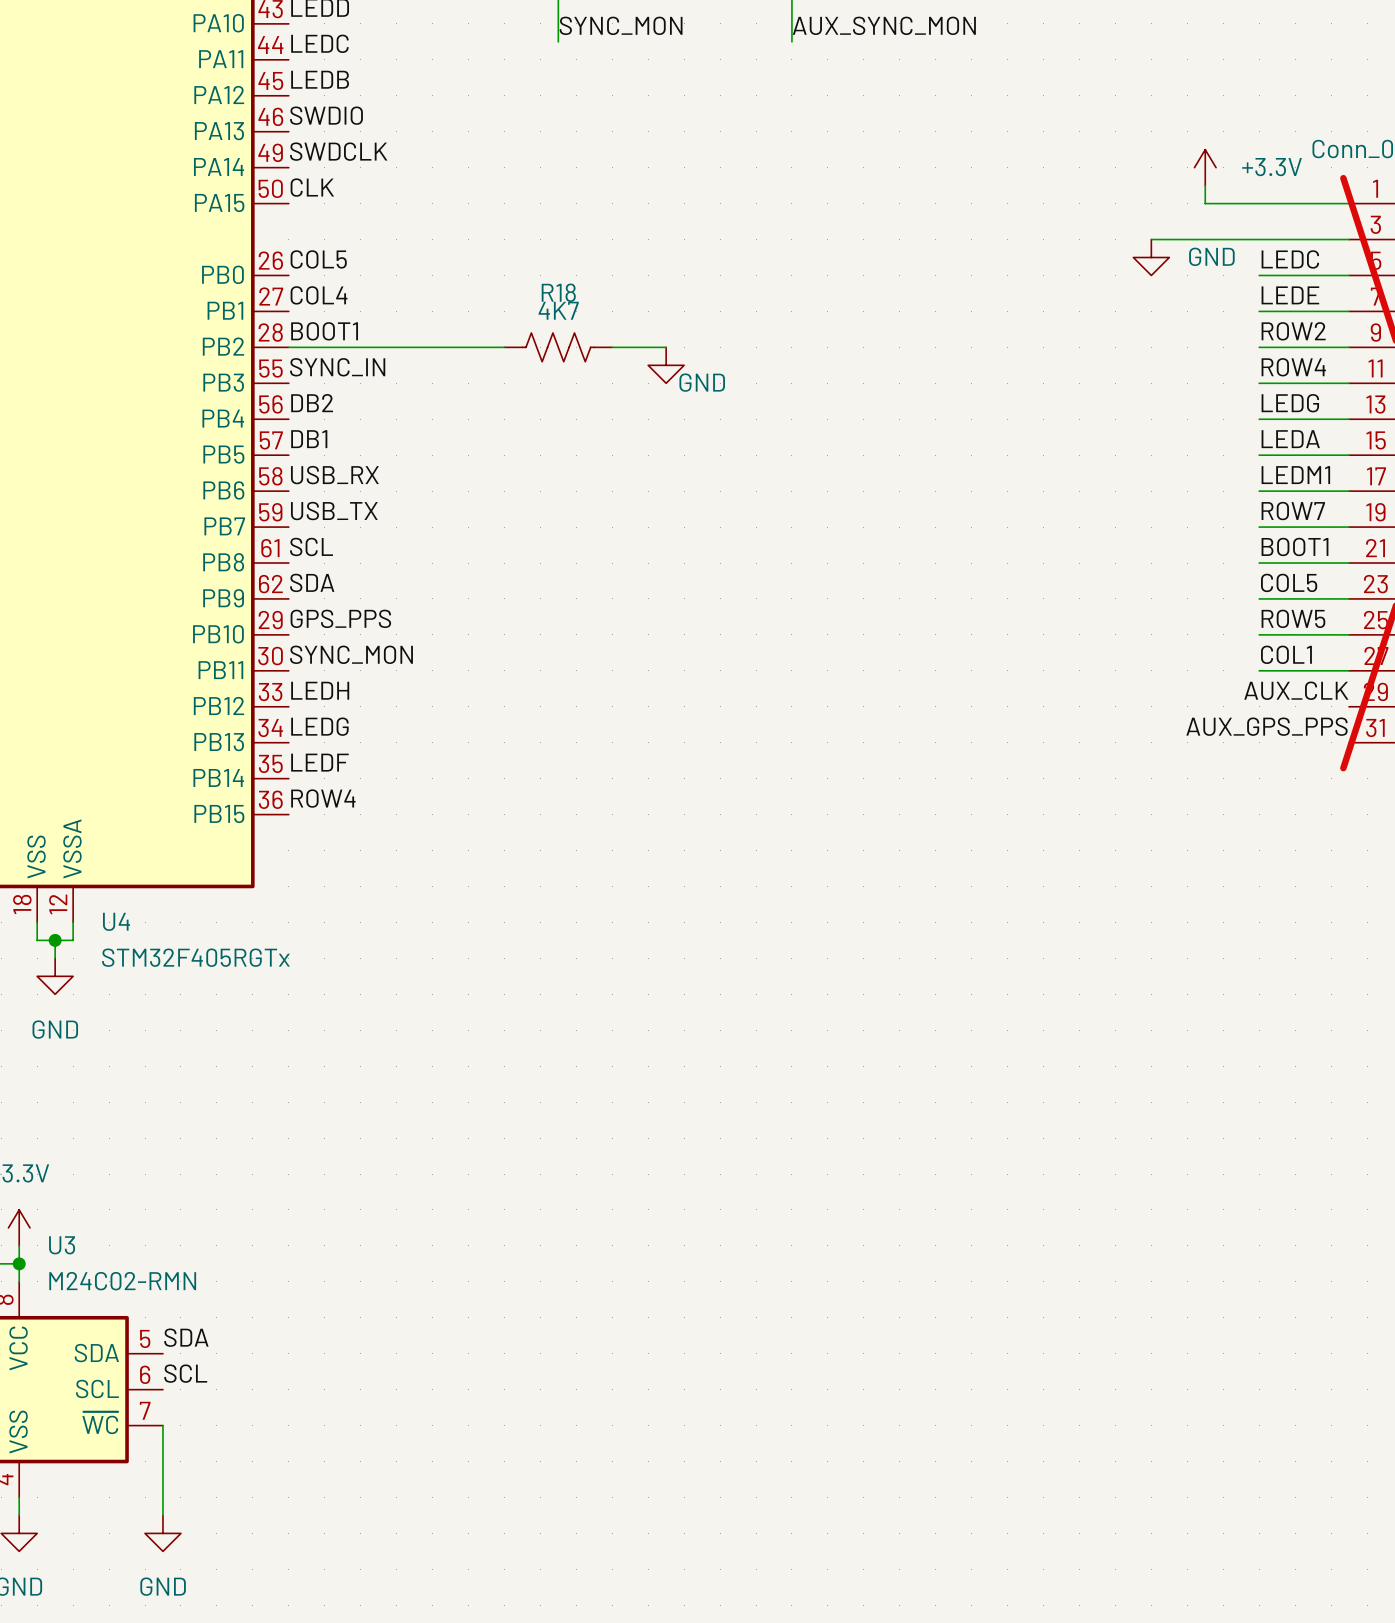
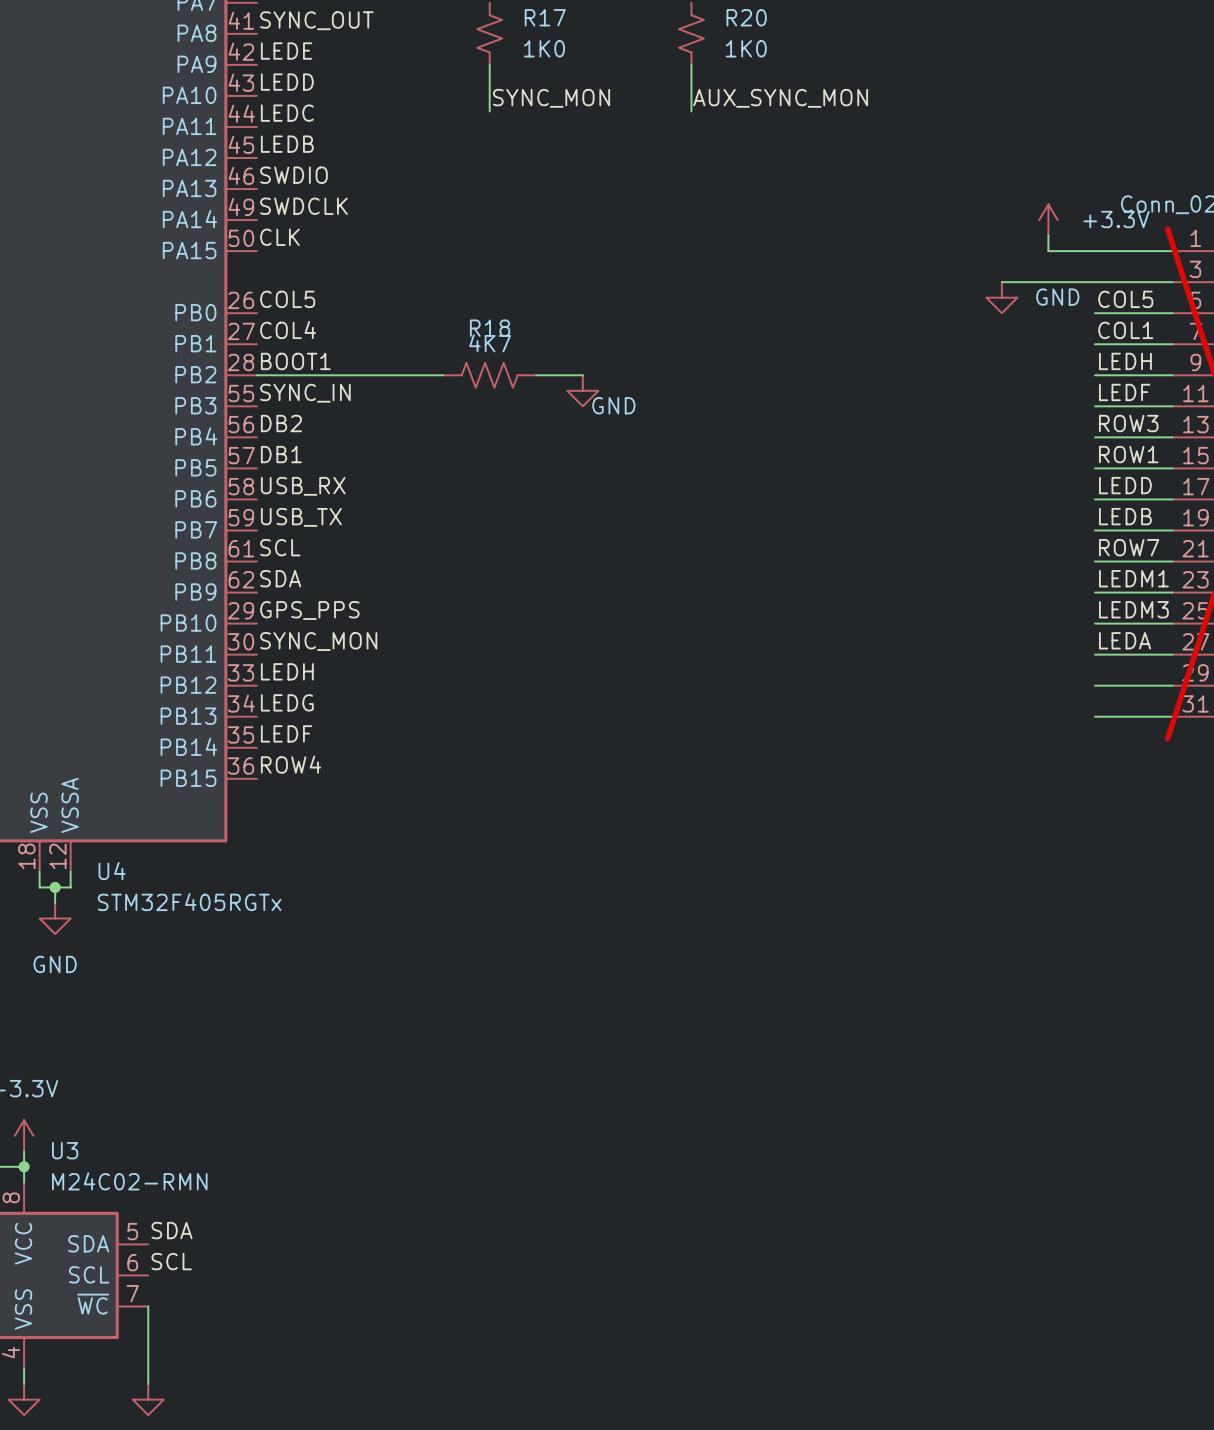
label: LEDC (1290, 259) -> COL5 (1125, 299)
label: LEDE (1290, 295) -> COL1 (1125, 330)
label: ROW2 (1293, 331) -> LEDH (1125, 361)
label: ROW4 (1293, 367) -> LEDF (1124, 392)
label: LEDG (1290, 403) -> ROW3 (1128, 423)
label: LEDA (1290, 439) -> ROW1 (1128, 454)
label: LEDM1 (1295, 475) -> LEDD (1125, 485)
label: ROW7 (1293, 511) -> LEDB (1125, 516)
label: BOOT1 (1295, 546) -> ROW7 (1129, 547)
label: COL5 (1289, 582) -> LEDM1 (1133, 578)
label: ROW5 (1293, 618) -> LEDM3 (1133, 609)
label: COL1 (1286, 654) -> LEDA (1125, 640)
label: AUX_CLK (1296, 690) -> none
wire: none -> (1094, 685) (1172, 685)
label: AUX_GPS_PPS (1267, 726) -> none
wire: none -> (1094, 716) (1172, 716)

